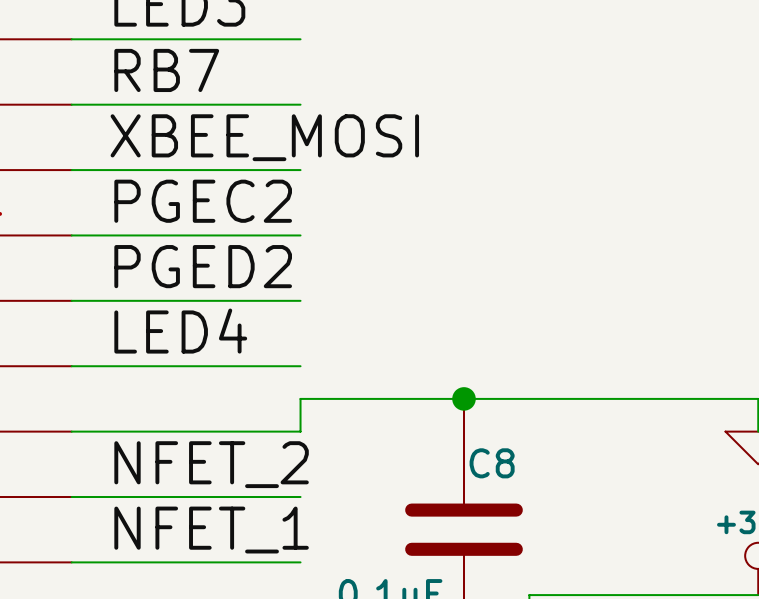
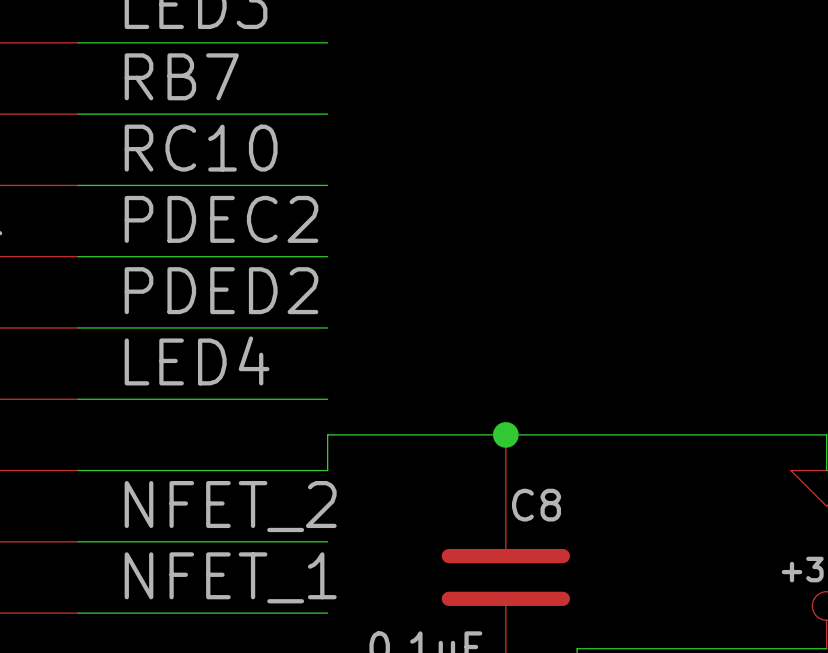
label: XBEE_MOSI (264, 137) -> RC10 (201, 148)
label: PGEC2 (203, 201) -> PDEC2 (221, 219)
label: PGED2 (203, 266) -> PDED2 (221, 290)

